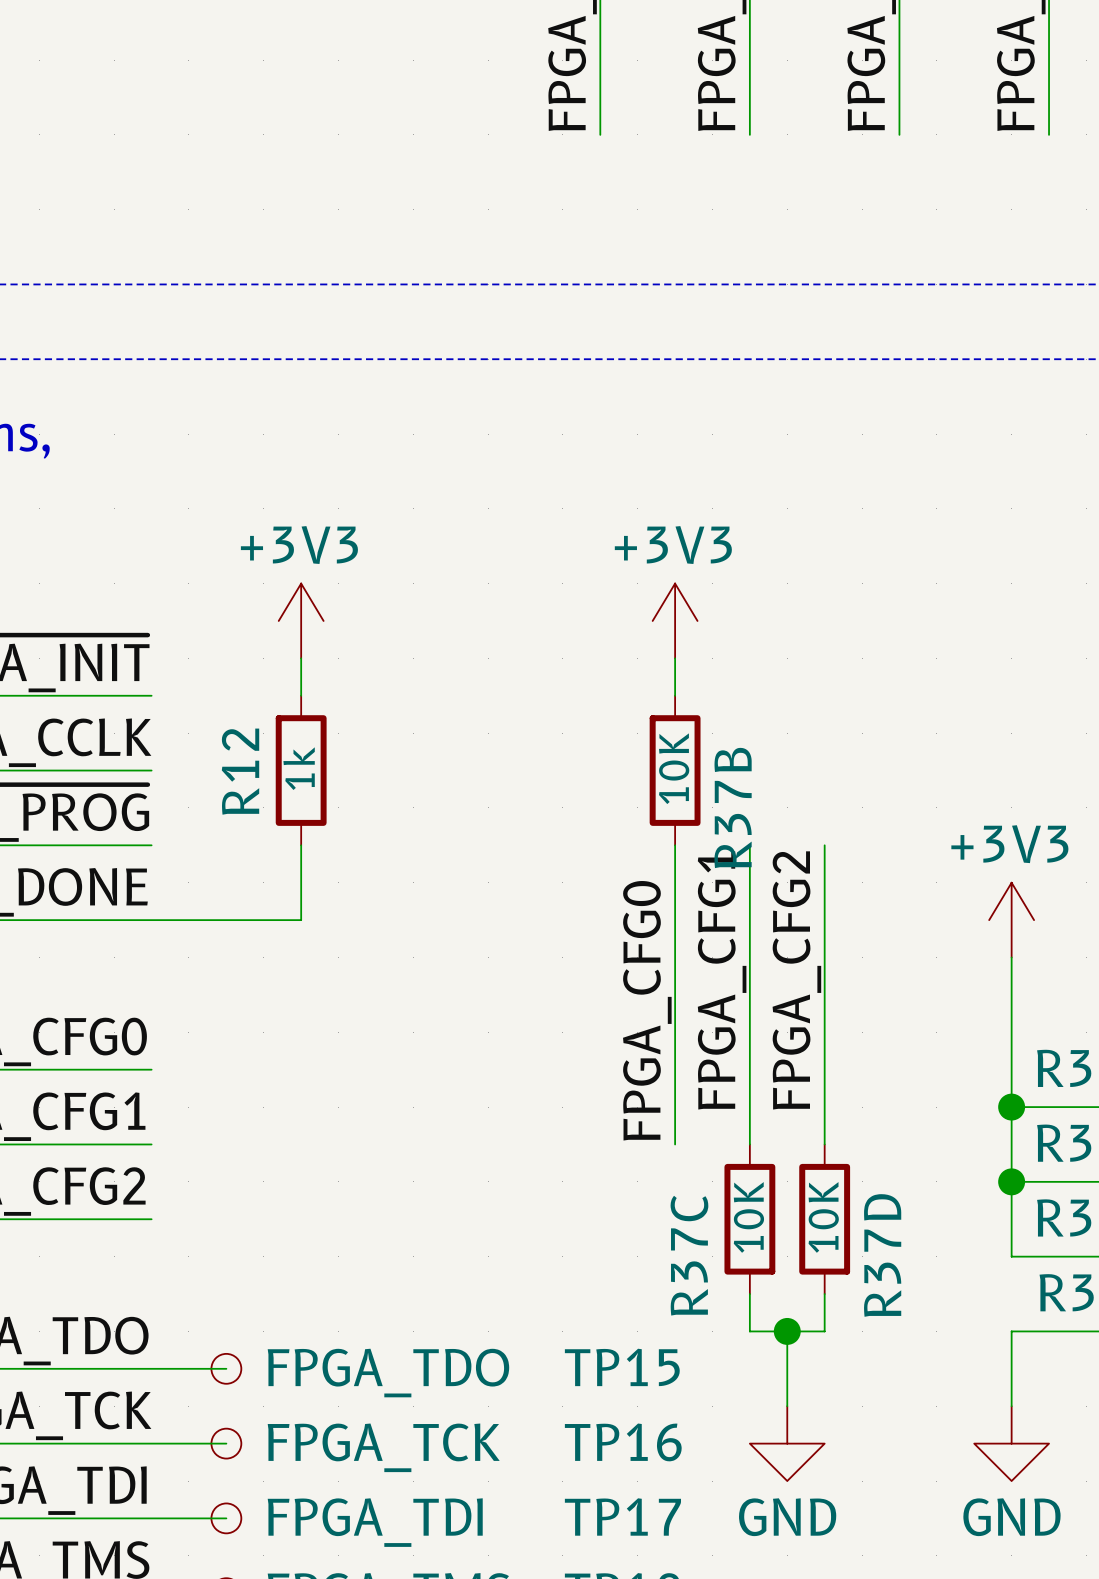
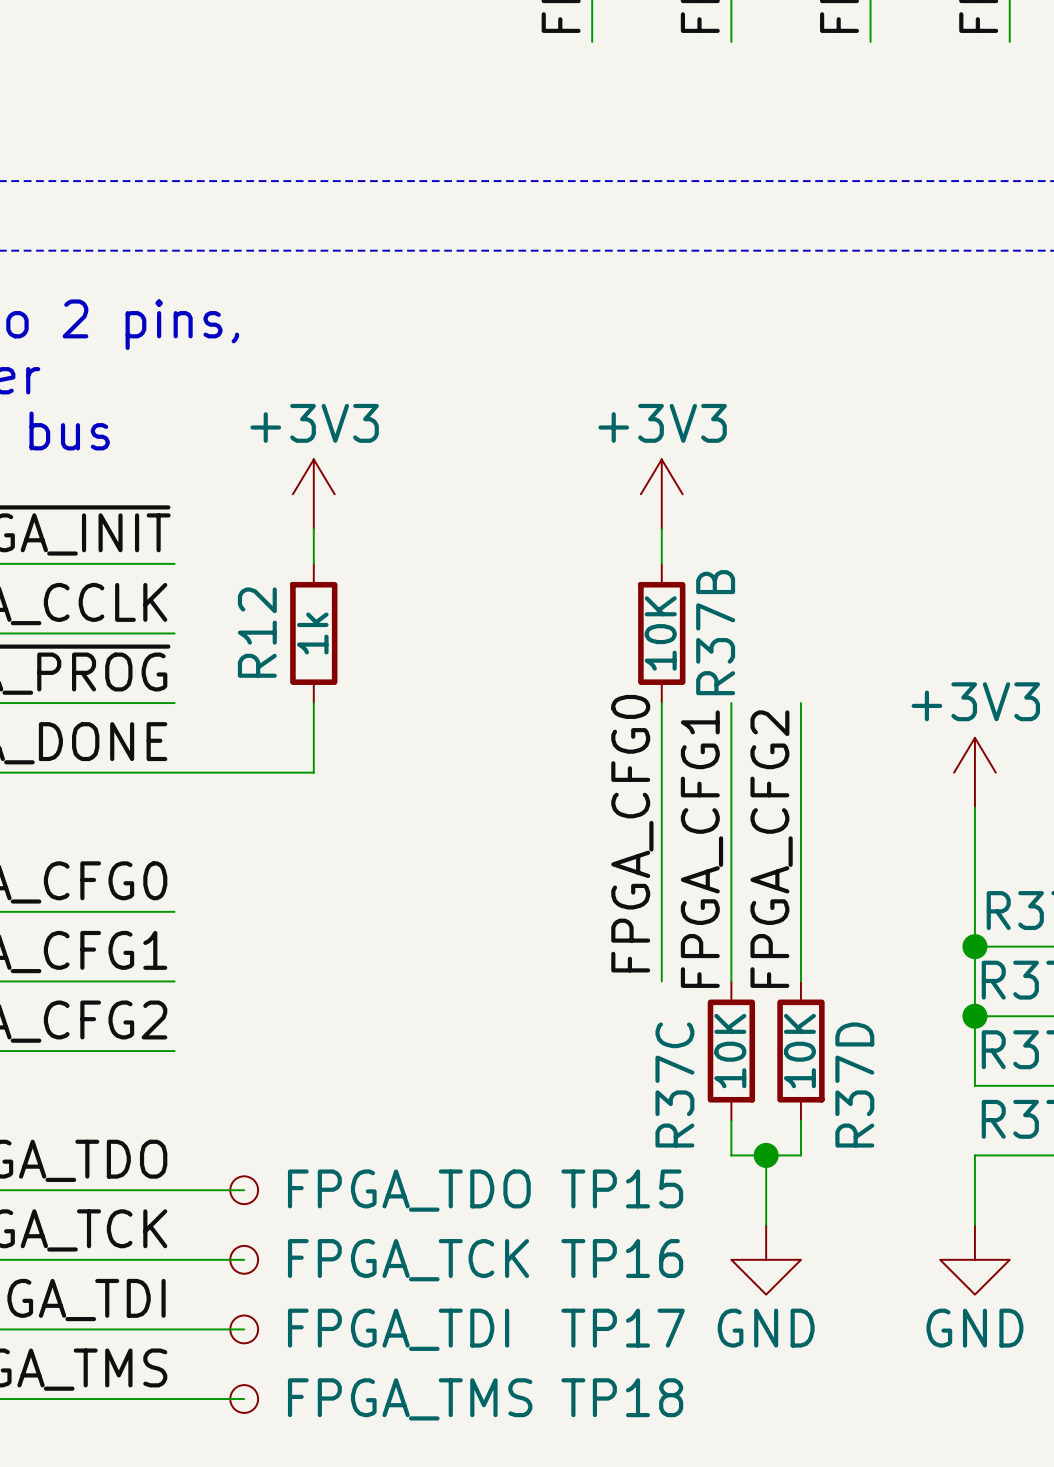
R37B name position: R37B (733, 807) -> R37B (715, 632)

